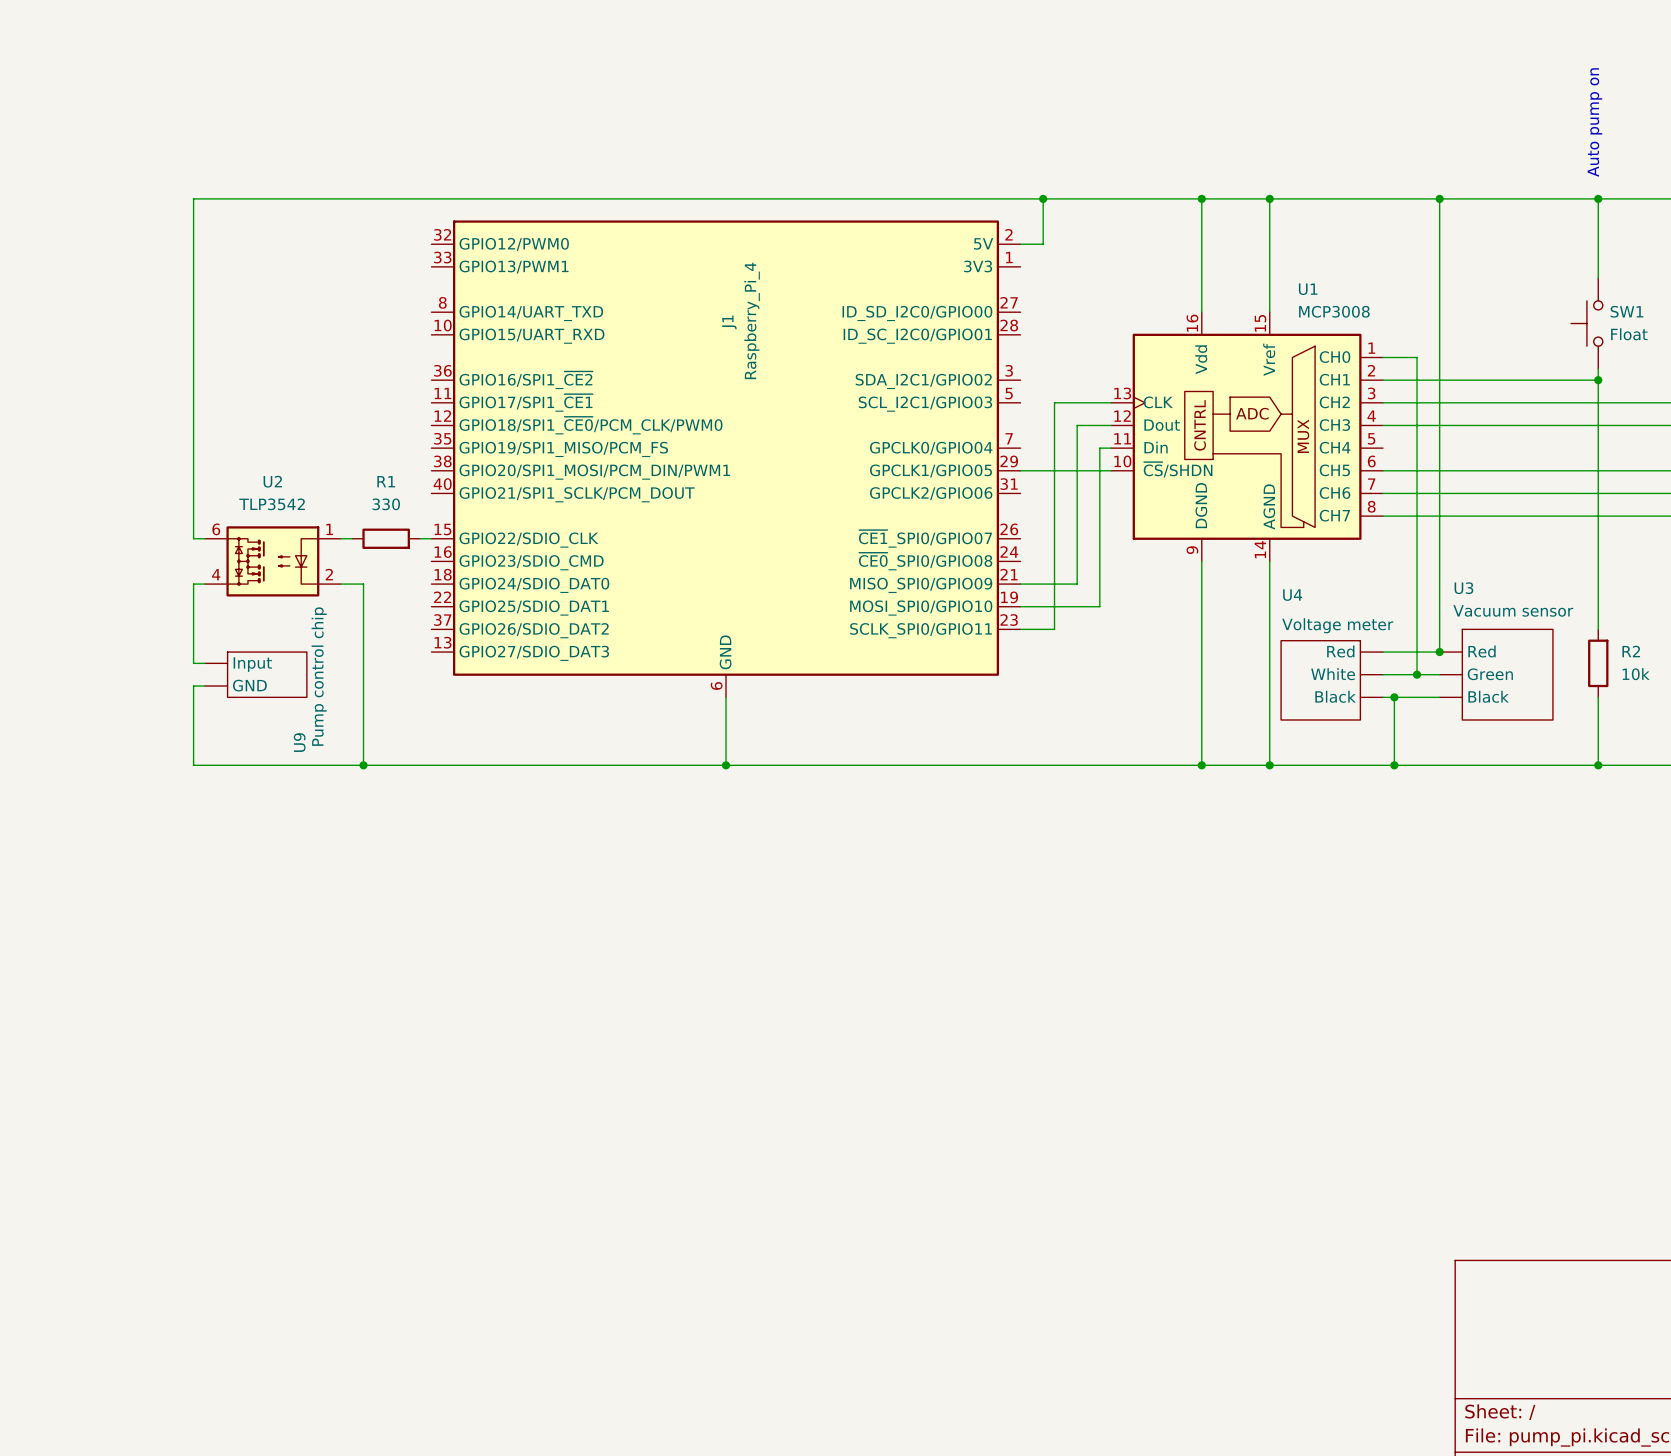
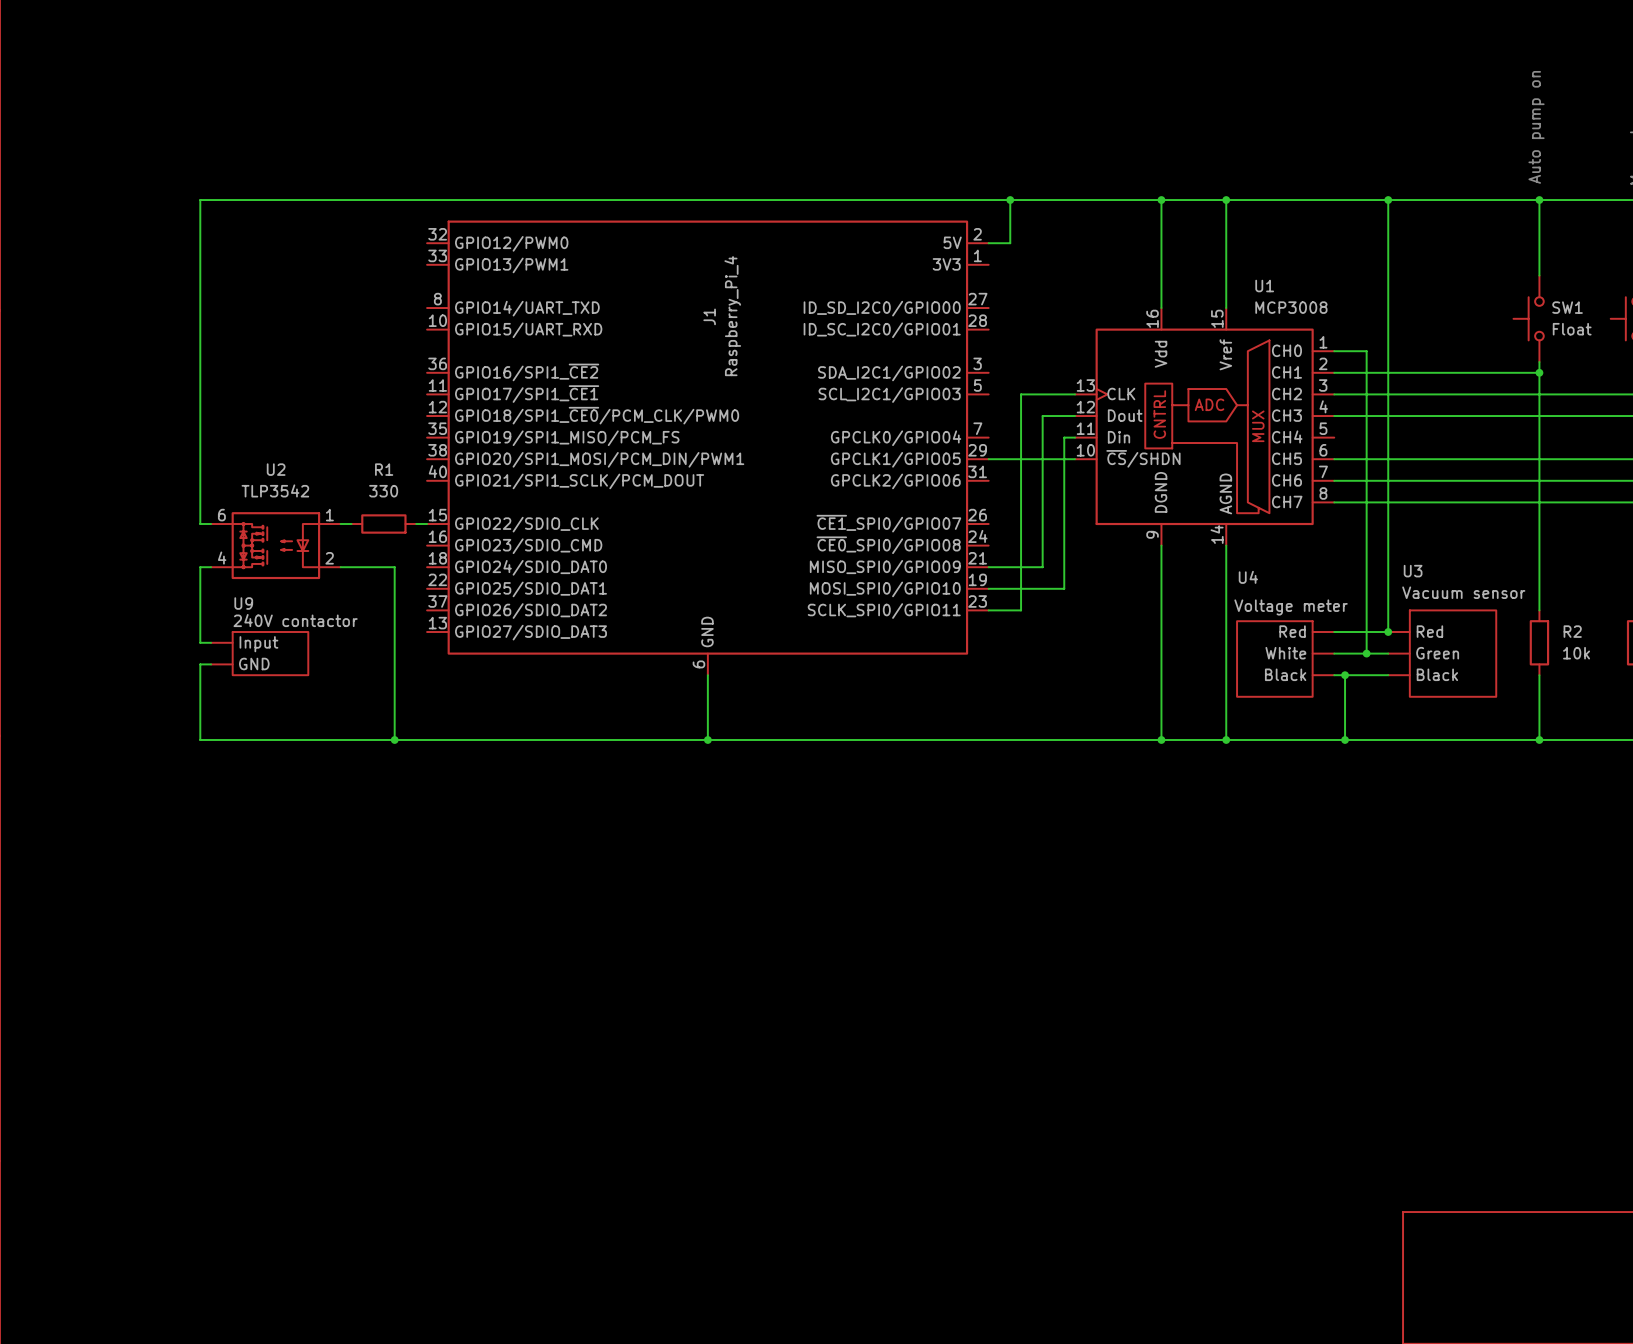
wire: (363, 584) (363, 765) -> (362, 567) (394, 567) (394, 739)
U9 value: Pump control chip (319, 676) -> 240V contactor (295, 620)
U9 name rotation: 0° (299, 742) -> 90° clockwise (243, 603)
U9 name position: U9 (299, 742) -> U9 (243, 603)
junction position: (363, 765) -> (394, 739)

